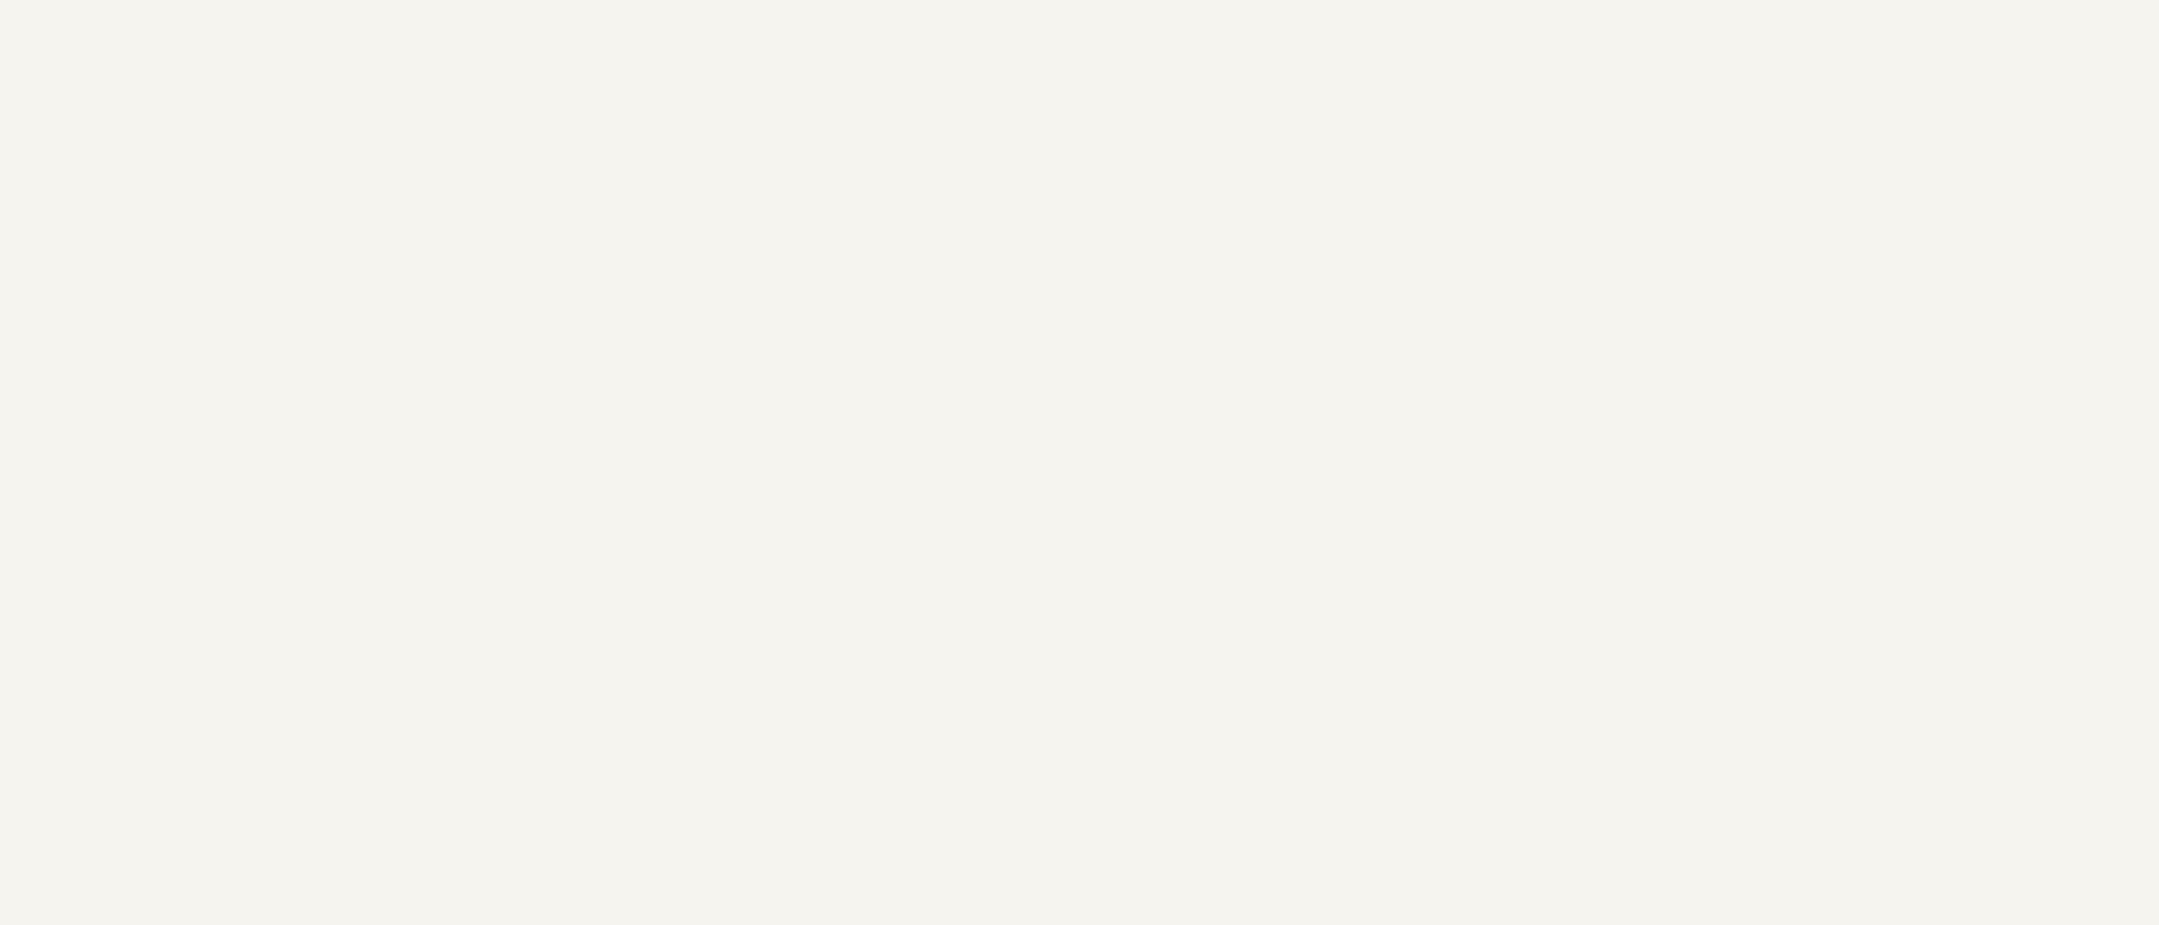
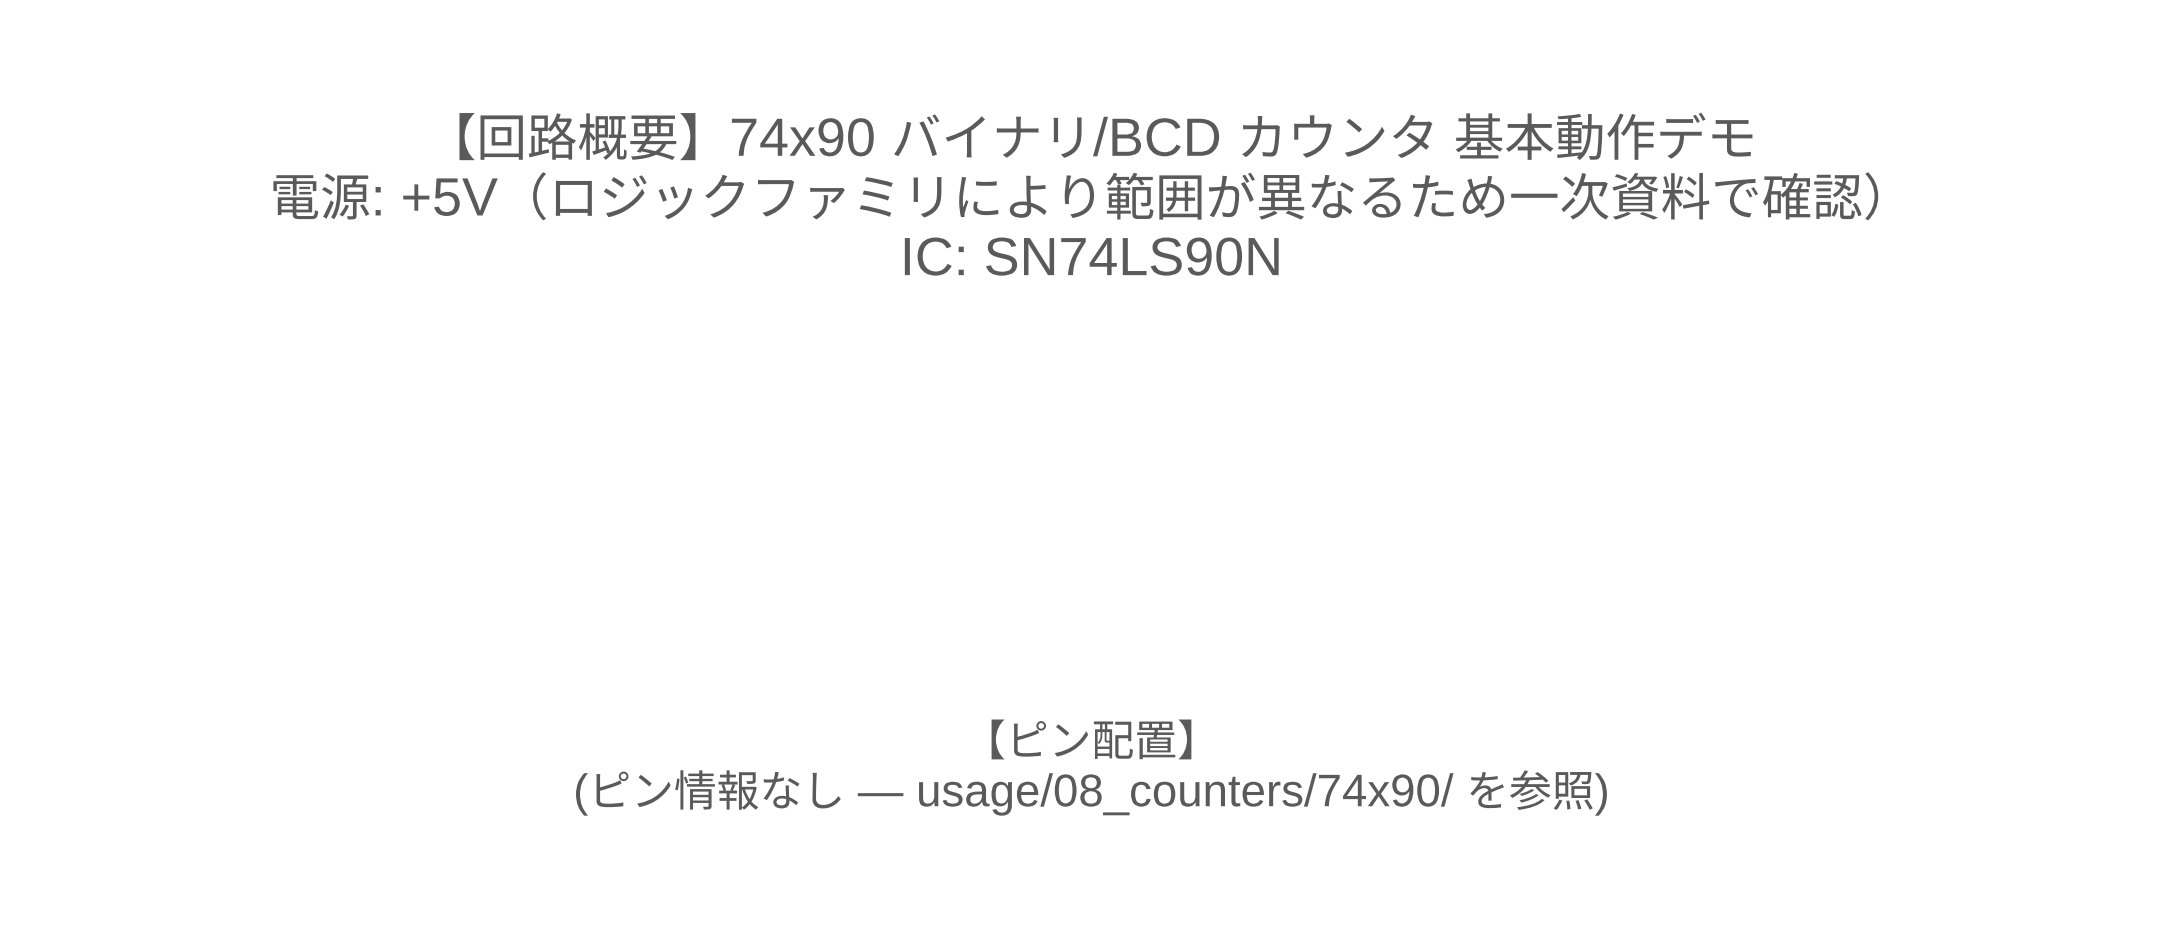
text: none -> 【回路概要】74x90 バイナリ/BCD カウンタ 基本動作デモ (1105, 136)
text: none -> 電源: +5V（ロジックファミリにより範囲が異なるため一次資料で確認） (1075, 196)
text: none -> IC: SN74LS90N (1091, 256)
text: none -> 【ピン配置】 (1091, 739)
text: none -> (ピン情報なし — usage/08_counters/74x90/ を参照) (1091, 792)

